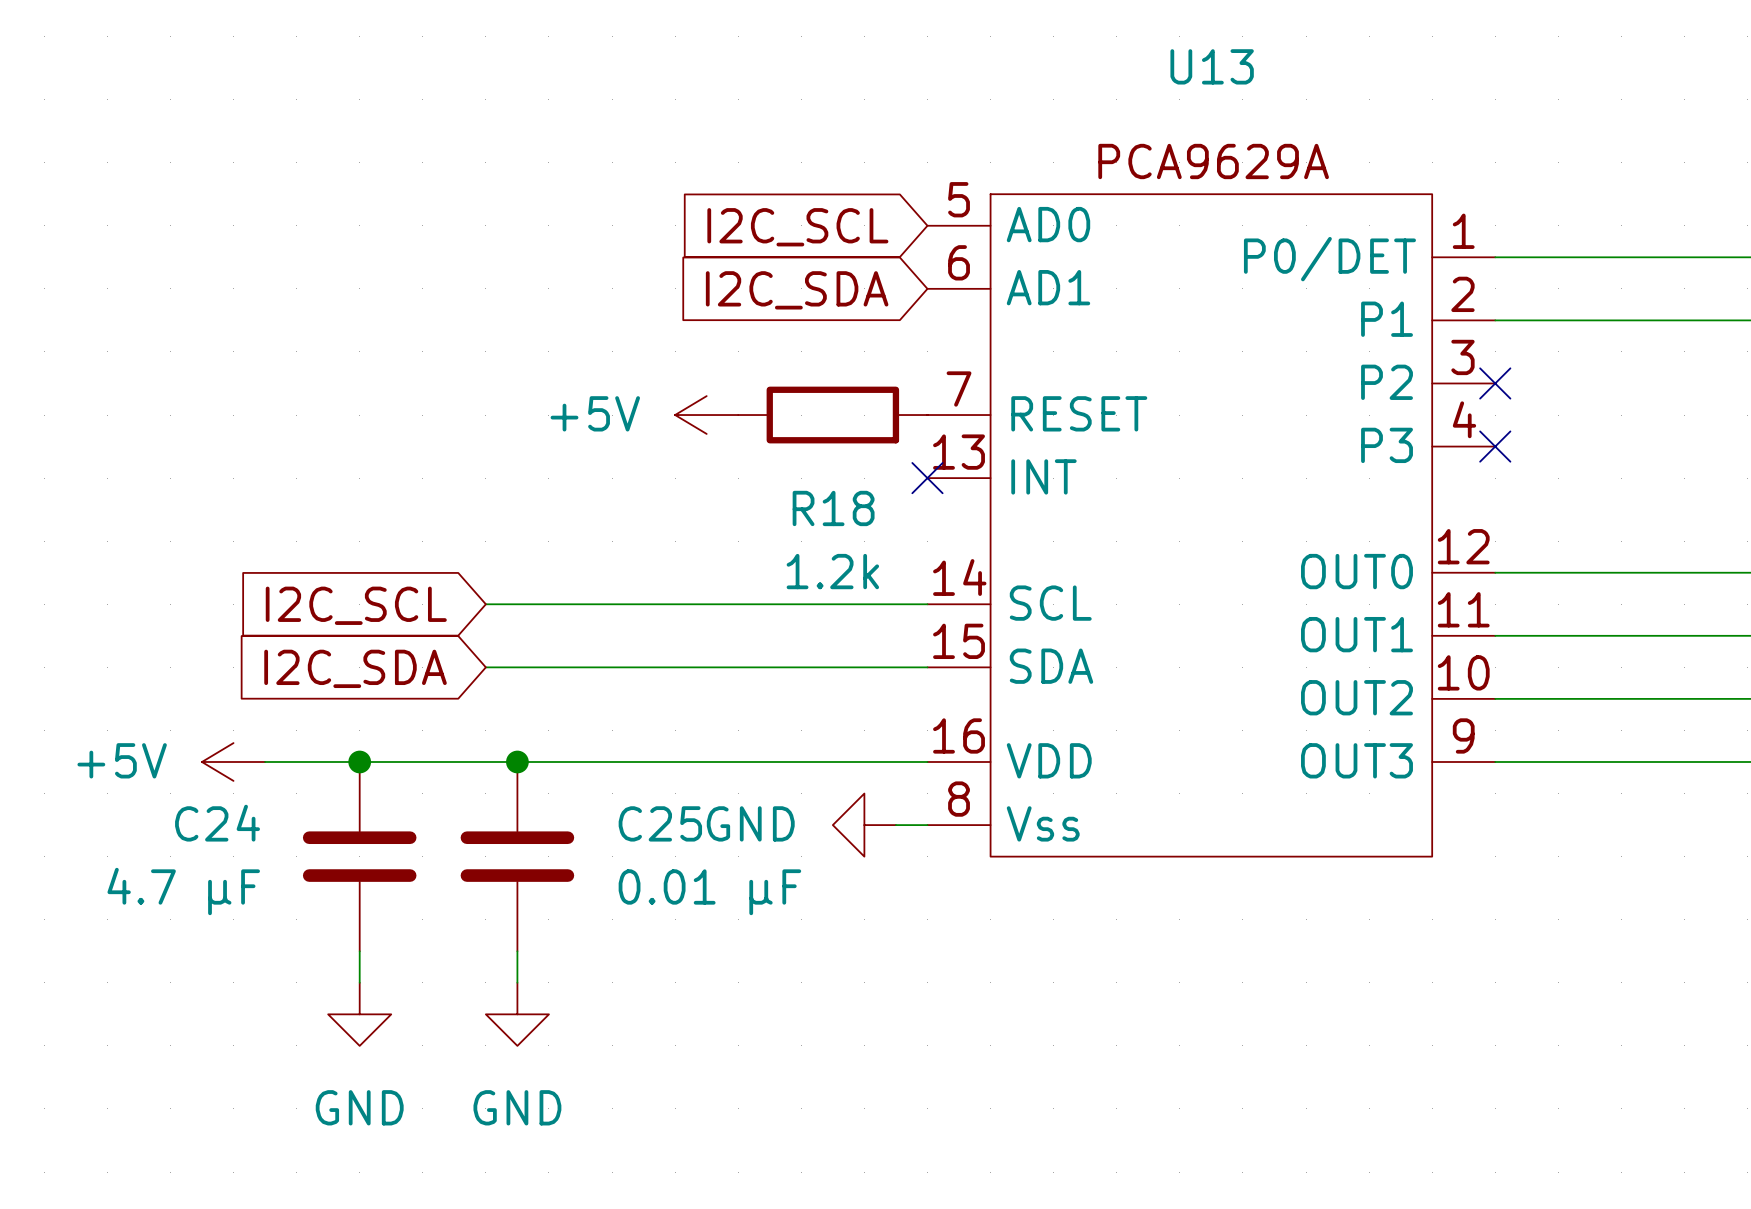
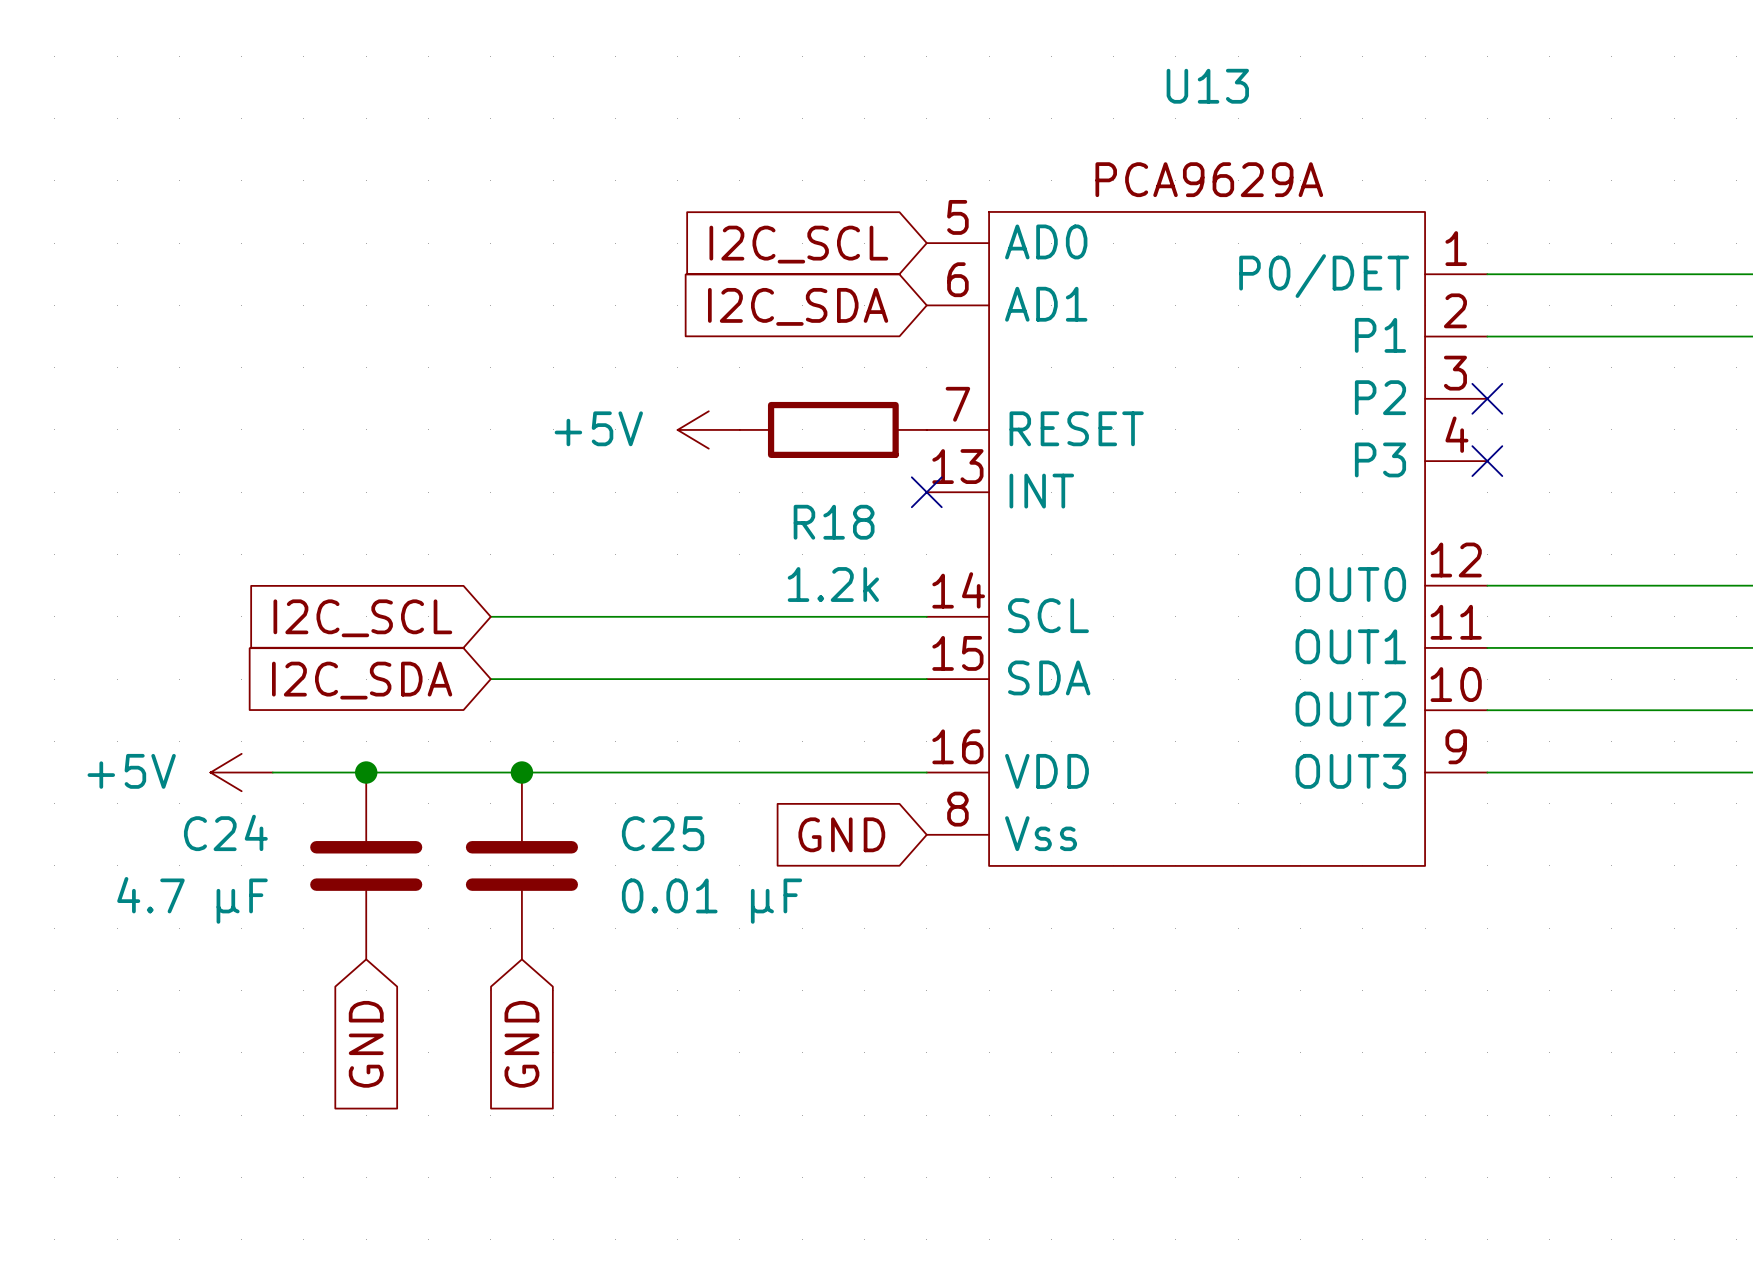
global label: none -> GND (841, 834)
power symbol: GND (864, 825) -> none
wire: (895, 825) (927, 825) -> none
wire: (359, 951) (359, 982) -> none
wire: (517, 951) (517, 982) -> none
power symbol: GND (359, 1014) -> none
power symbol: GND (517, 1014) -> none
global label: none -> GND (366, 1044)
global label: none -> GND (521, 1044)

